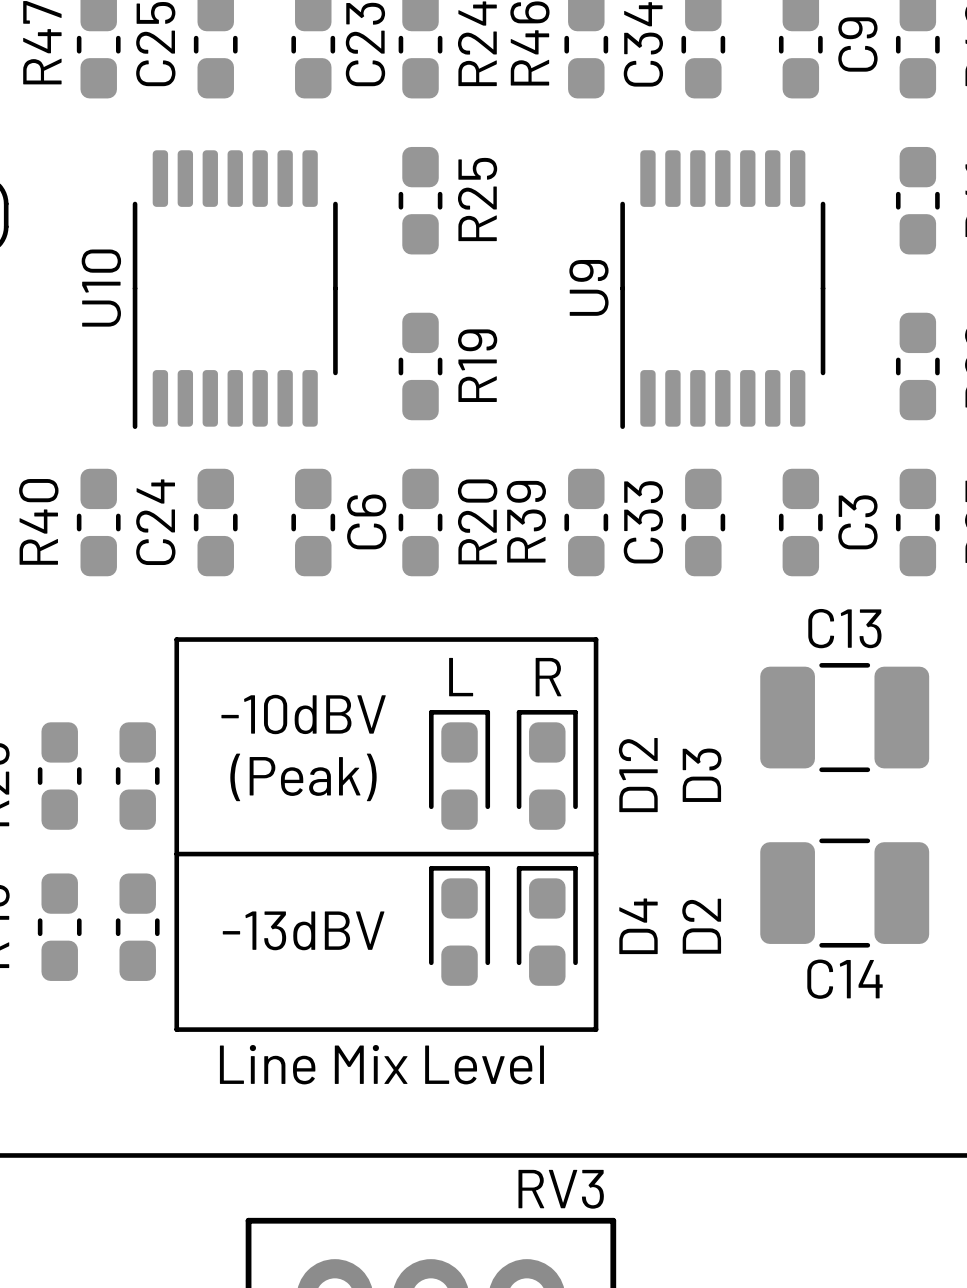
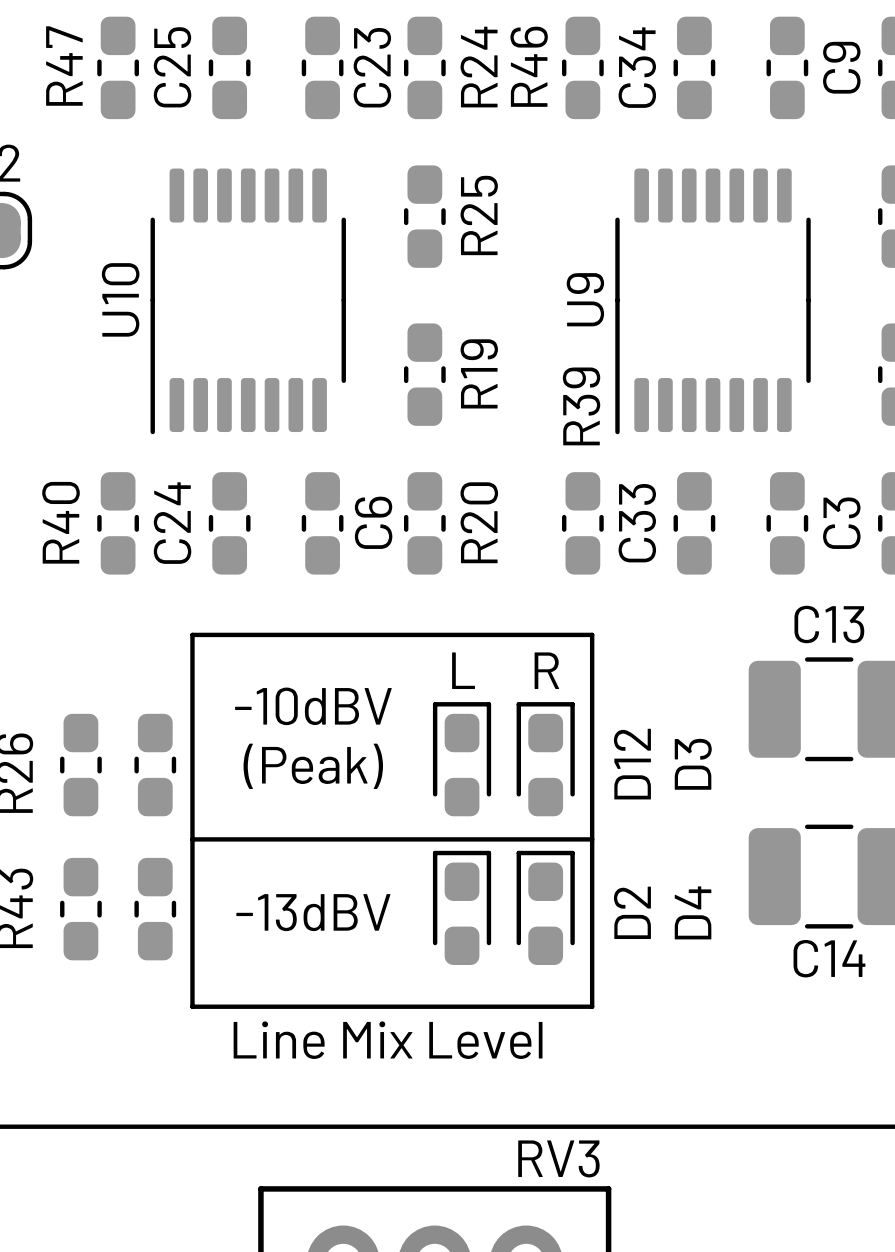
R39 name position: R39 (526, 521) -> R39 (581, 406)
D4 name position: D4 (638, 926) -> D4 (693, 912)
D2 name position: D2 (701, 926) -> D2 (632, 912)

